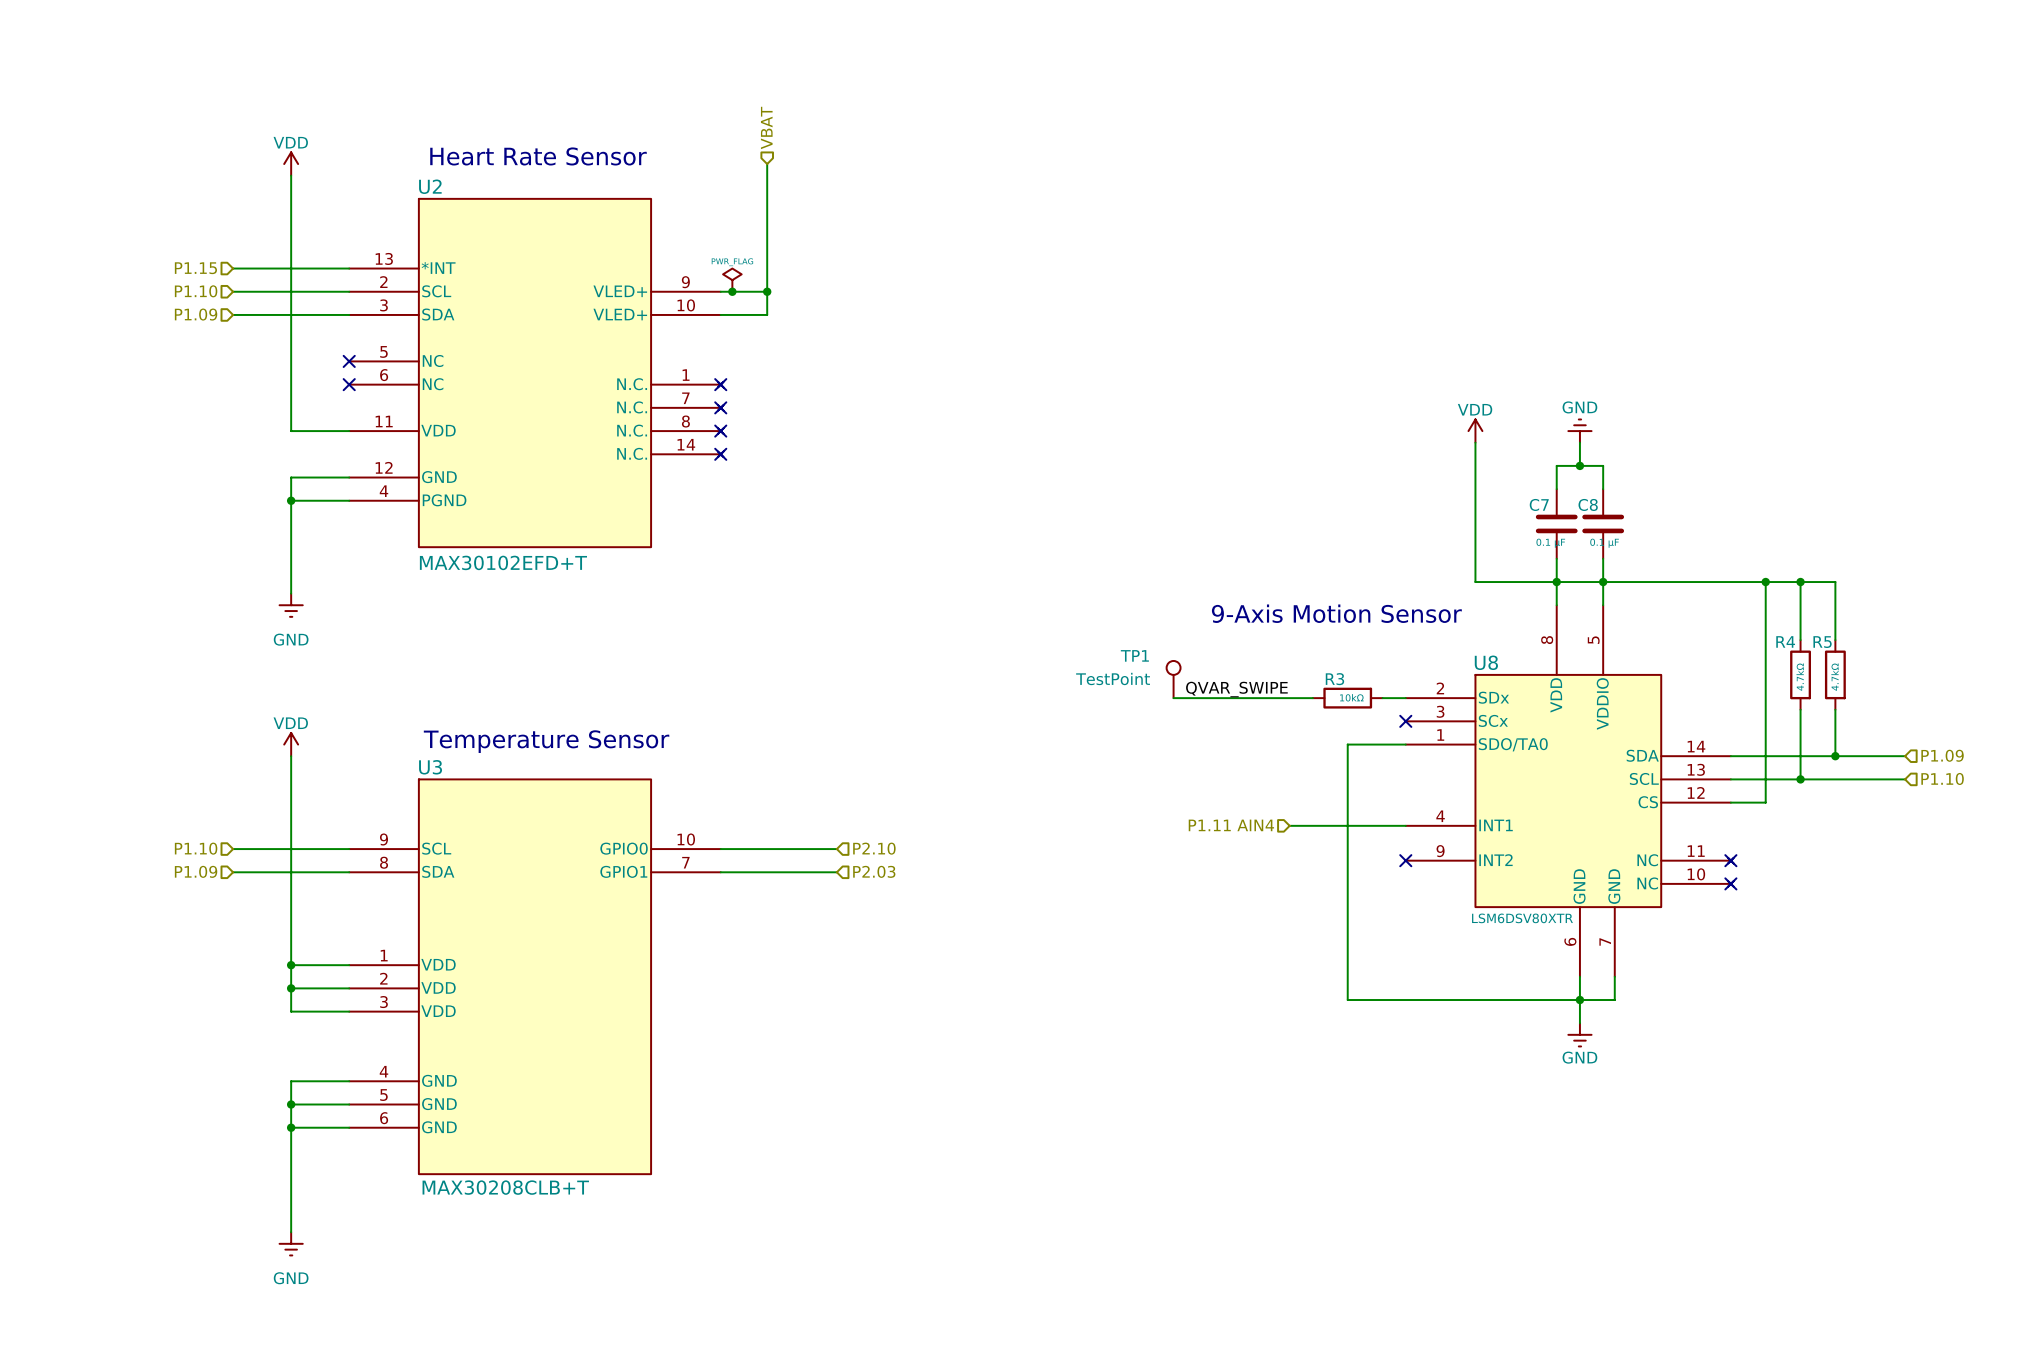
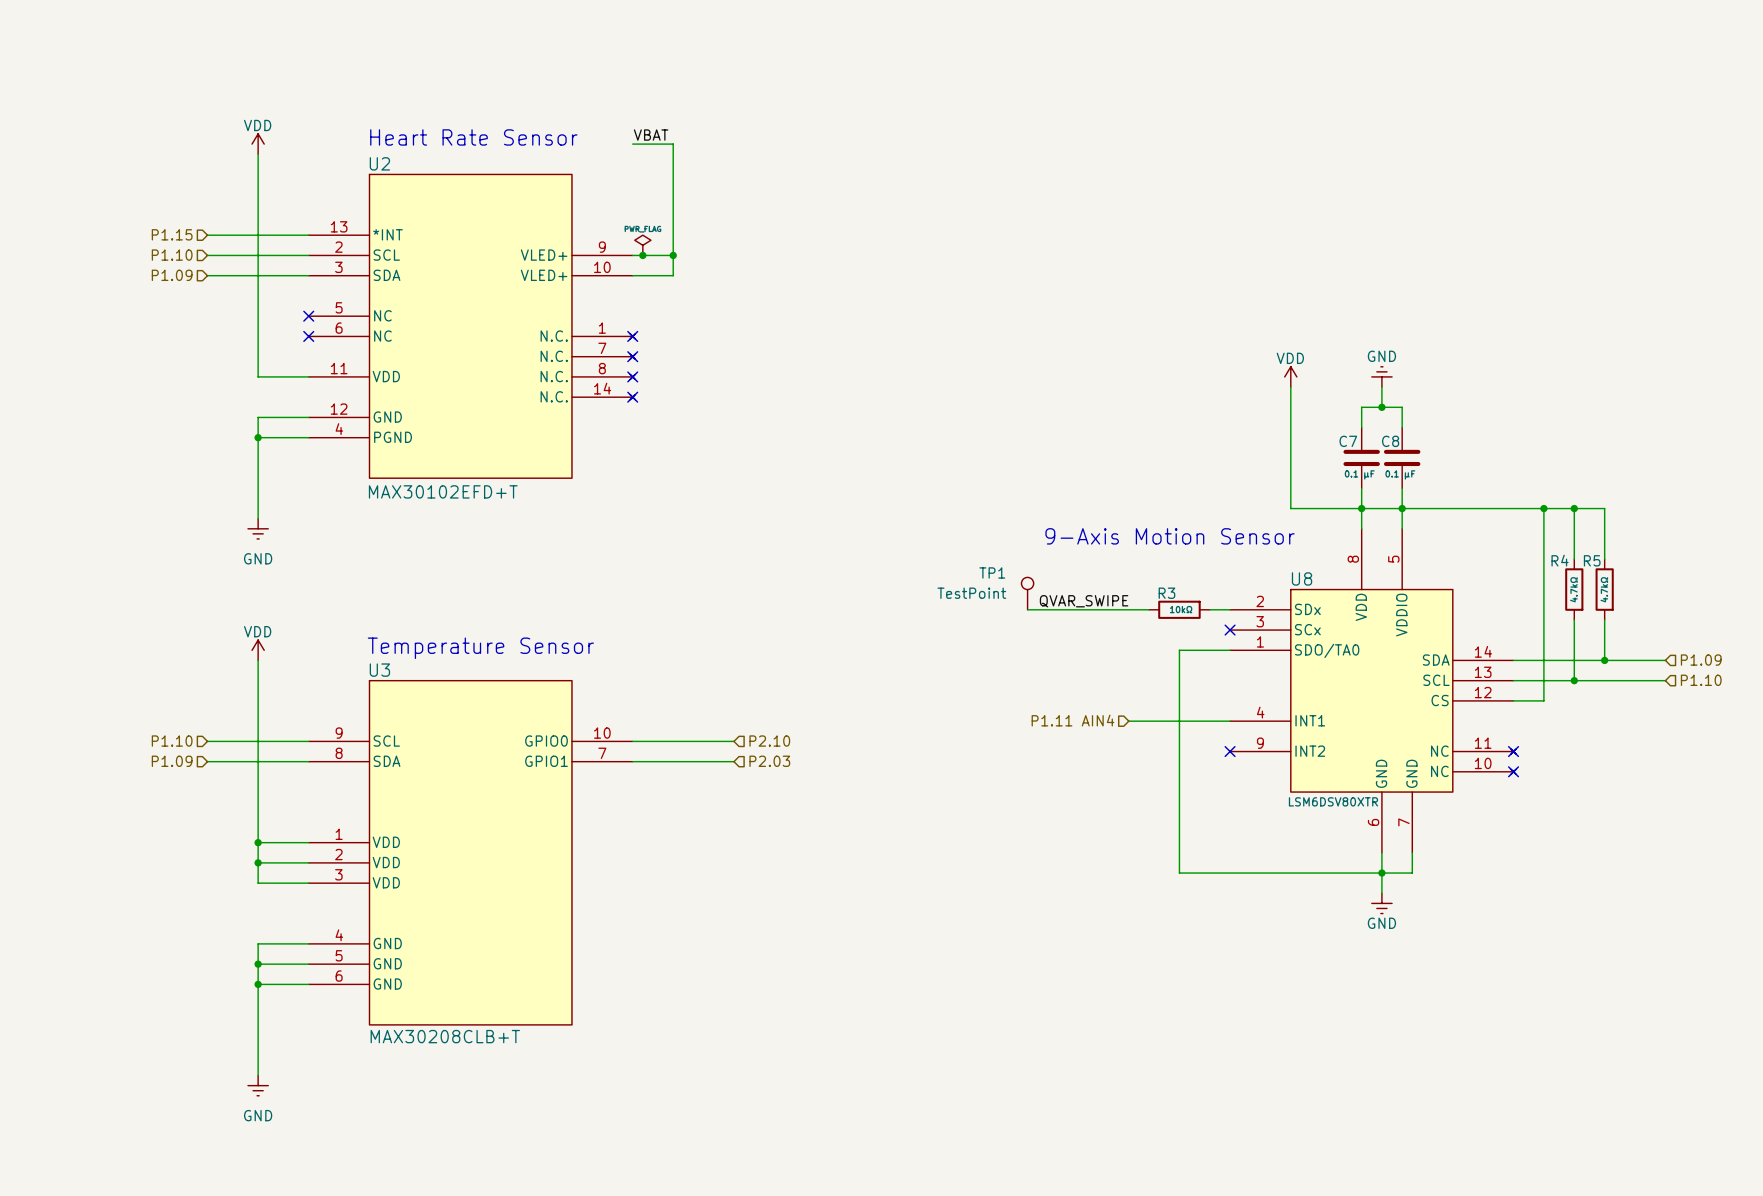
hierarchical label: VBAT (766, 127) -> none
label: none -> VBAT (651, 135)
wire: none -> (632, 144) (673, 144)

